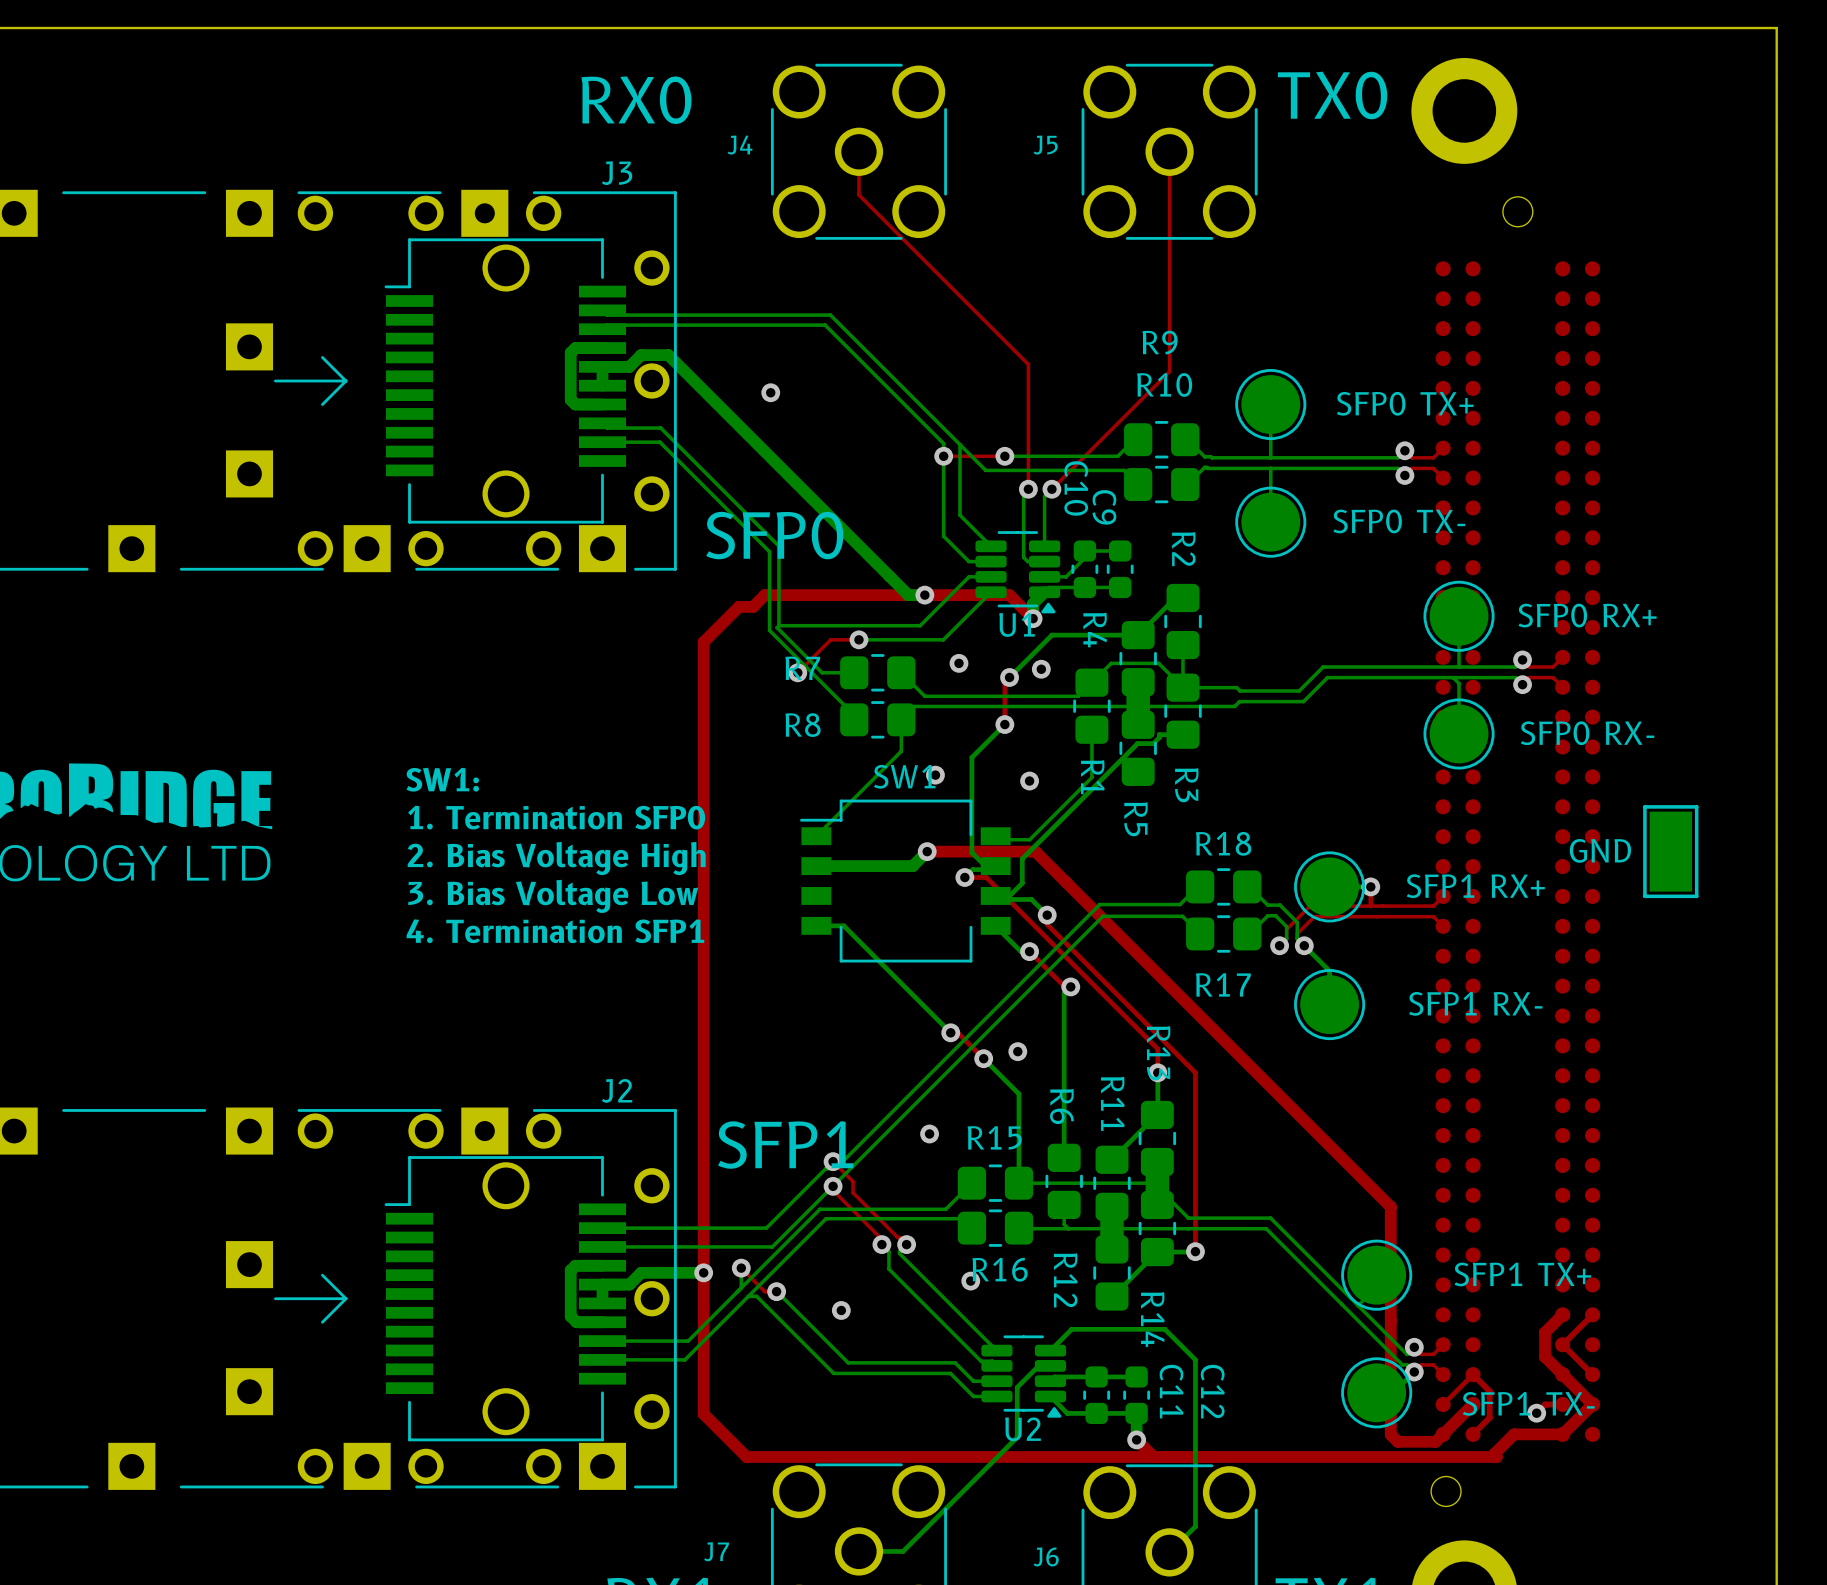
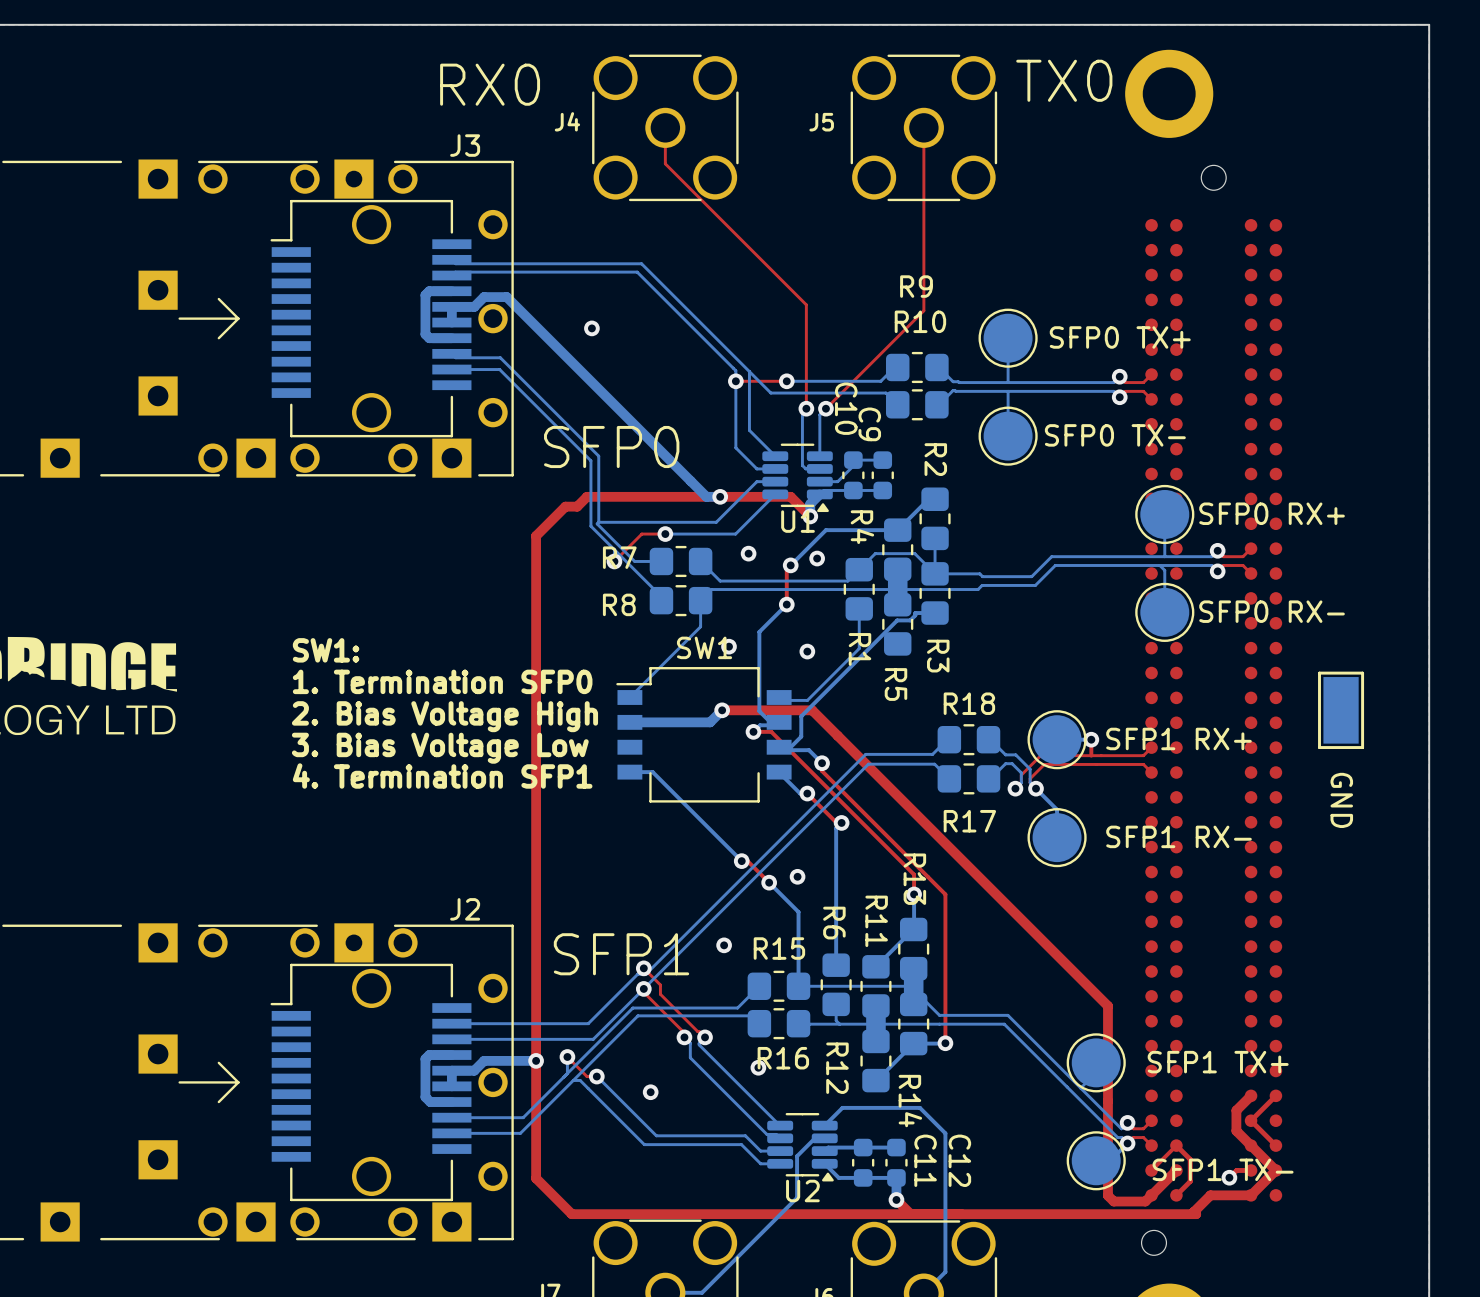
part value rotation: 0° (1600, 850) -> 90° clockwise (1341, 800)
part value position: GND (1600, 850) -> GND (1341, 800)

